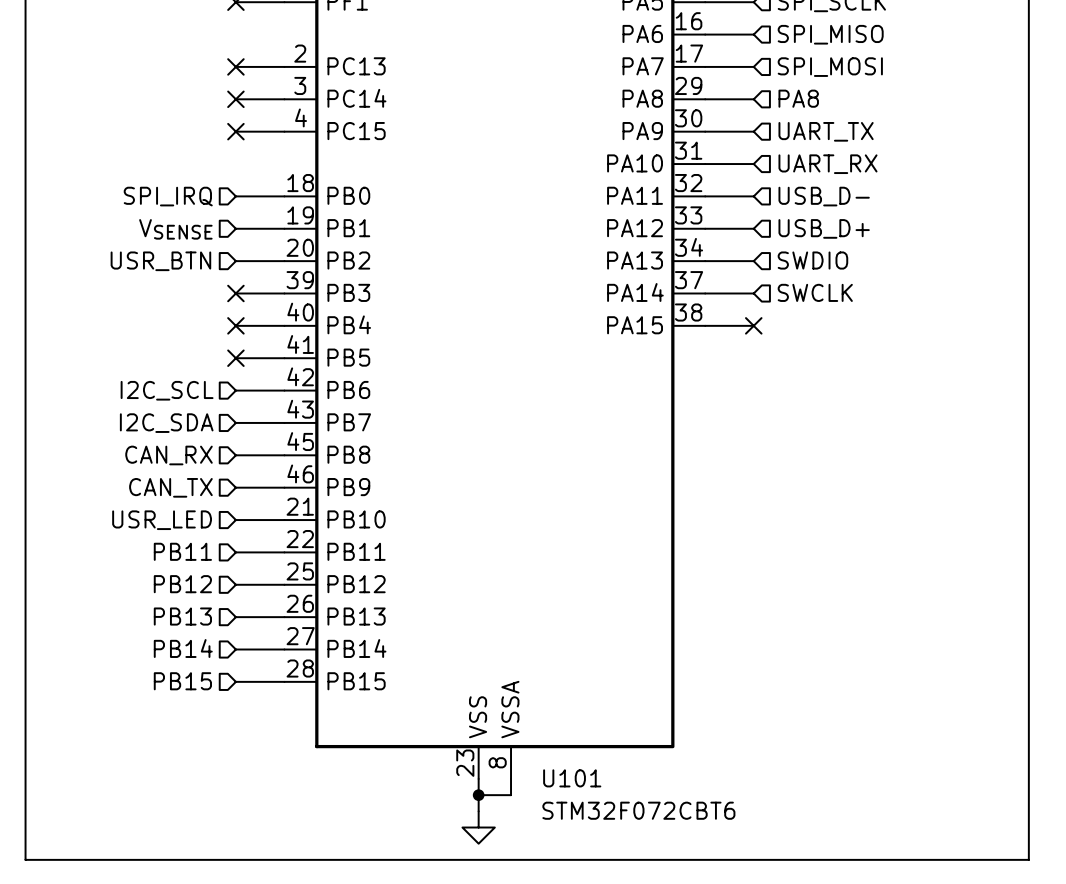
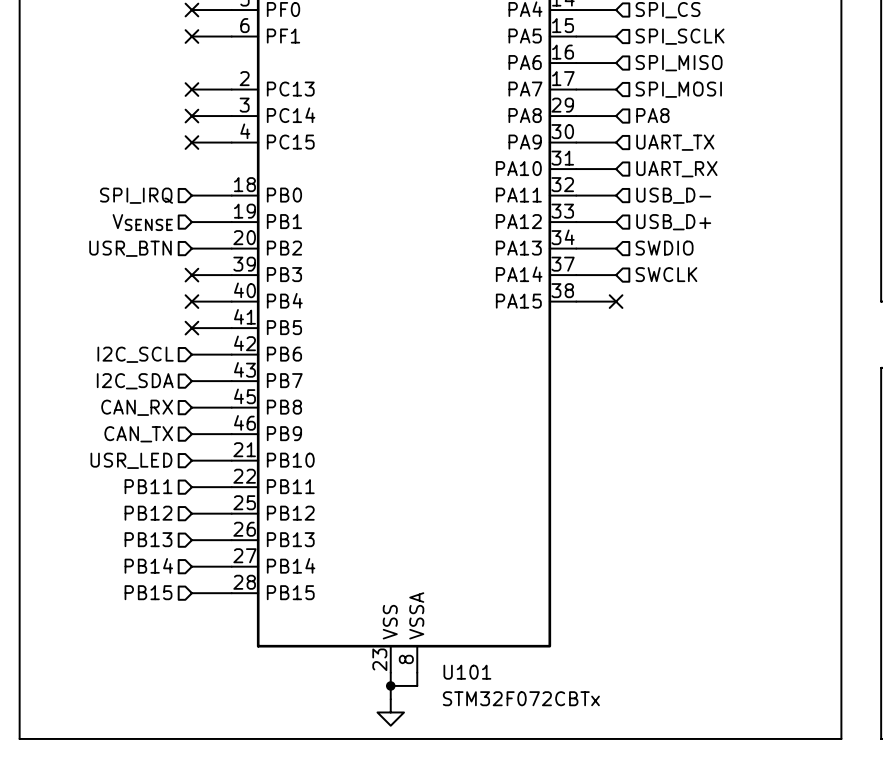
U101 value: STM32F072CBT6 (638, 810) -> STM32F072CBTx (521, 698)

